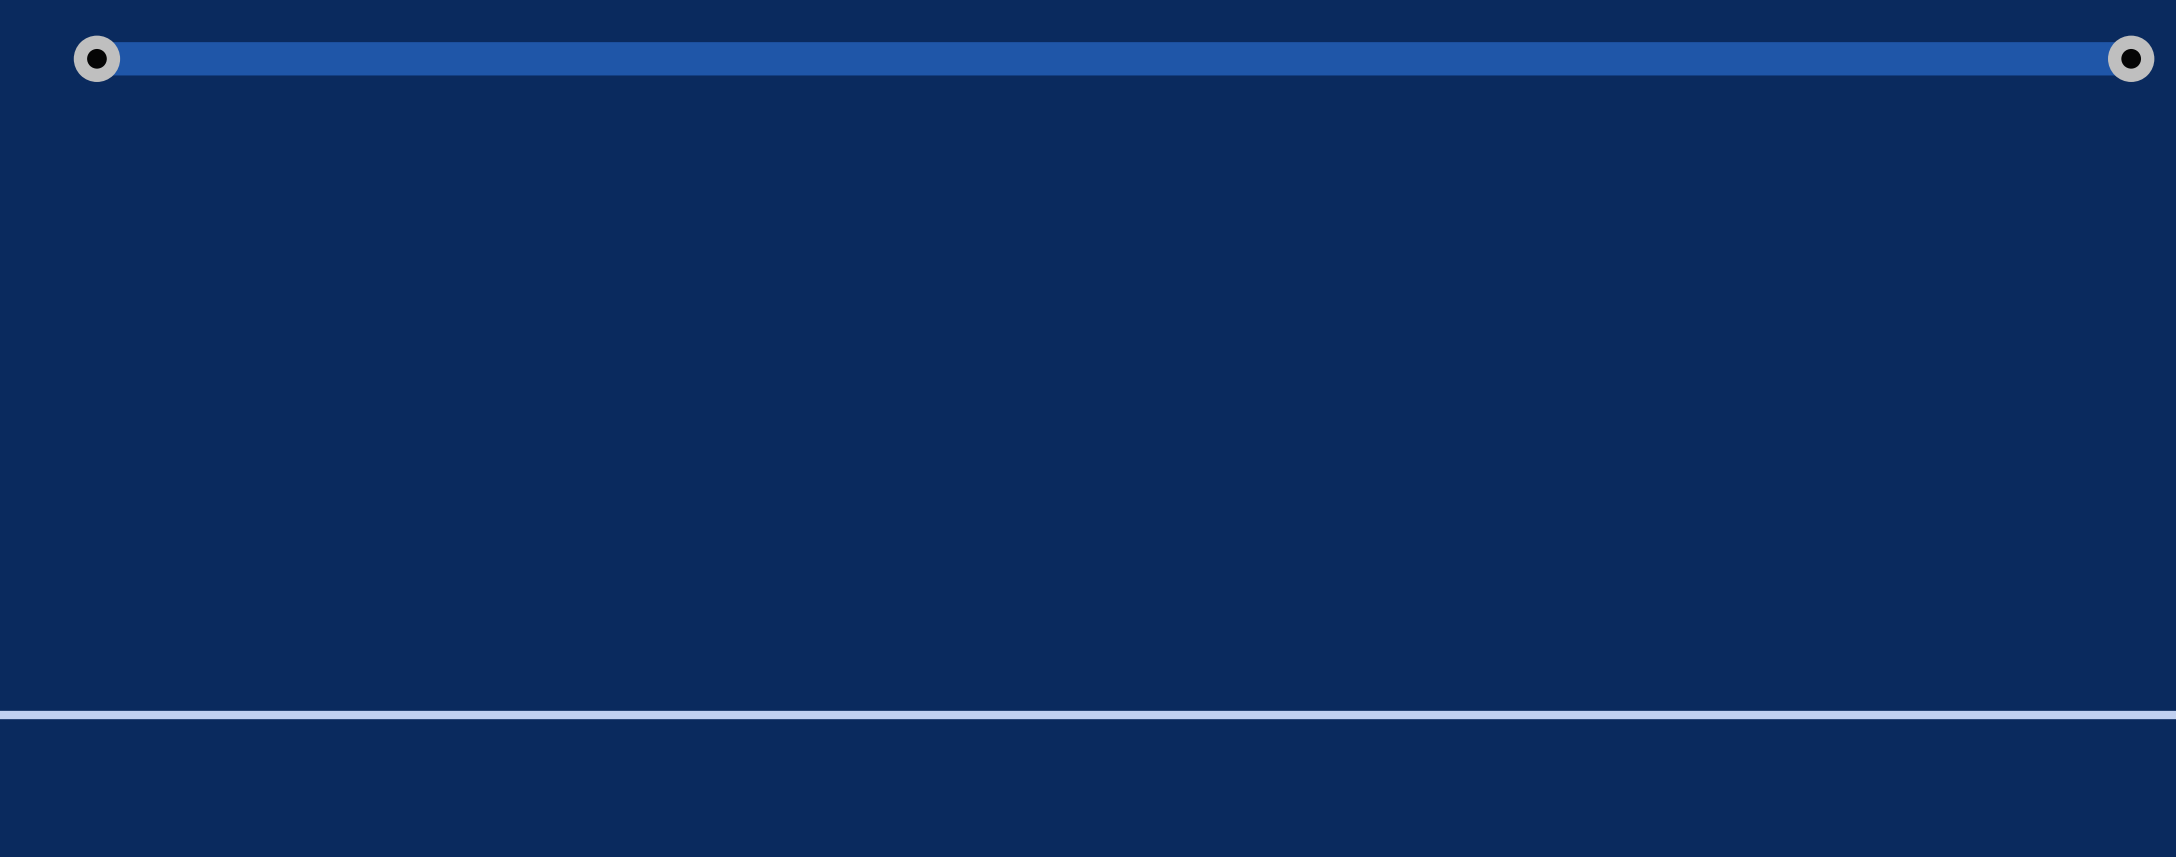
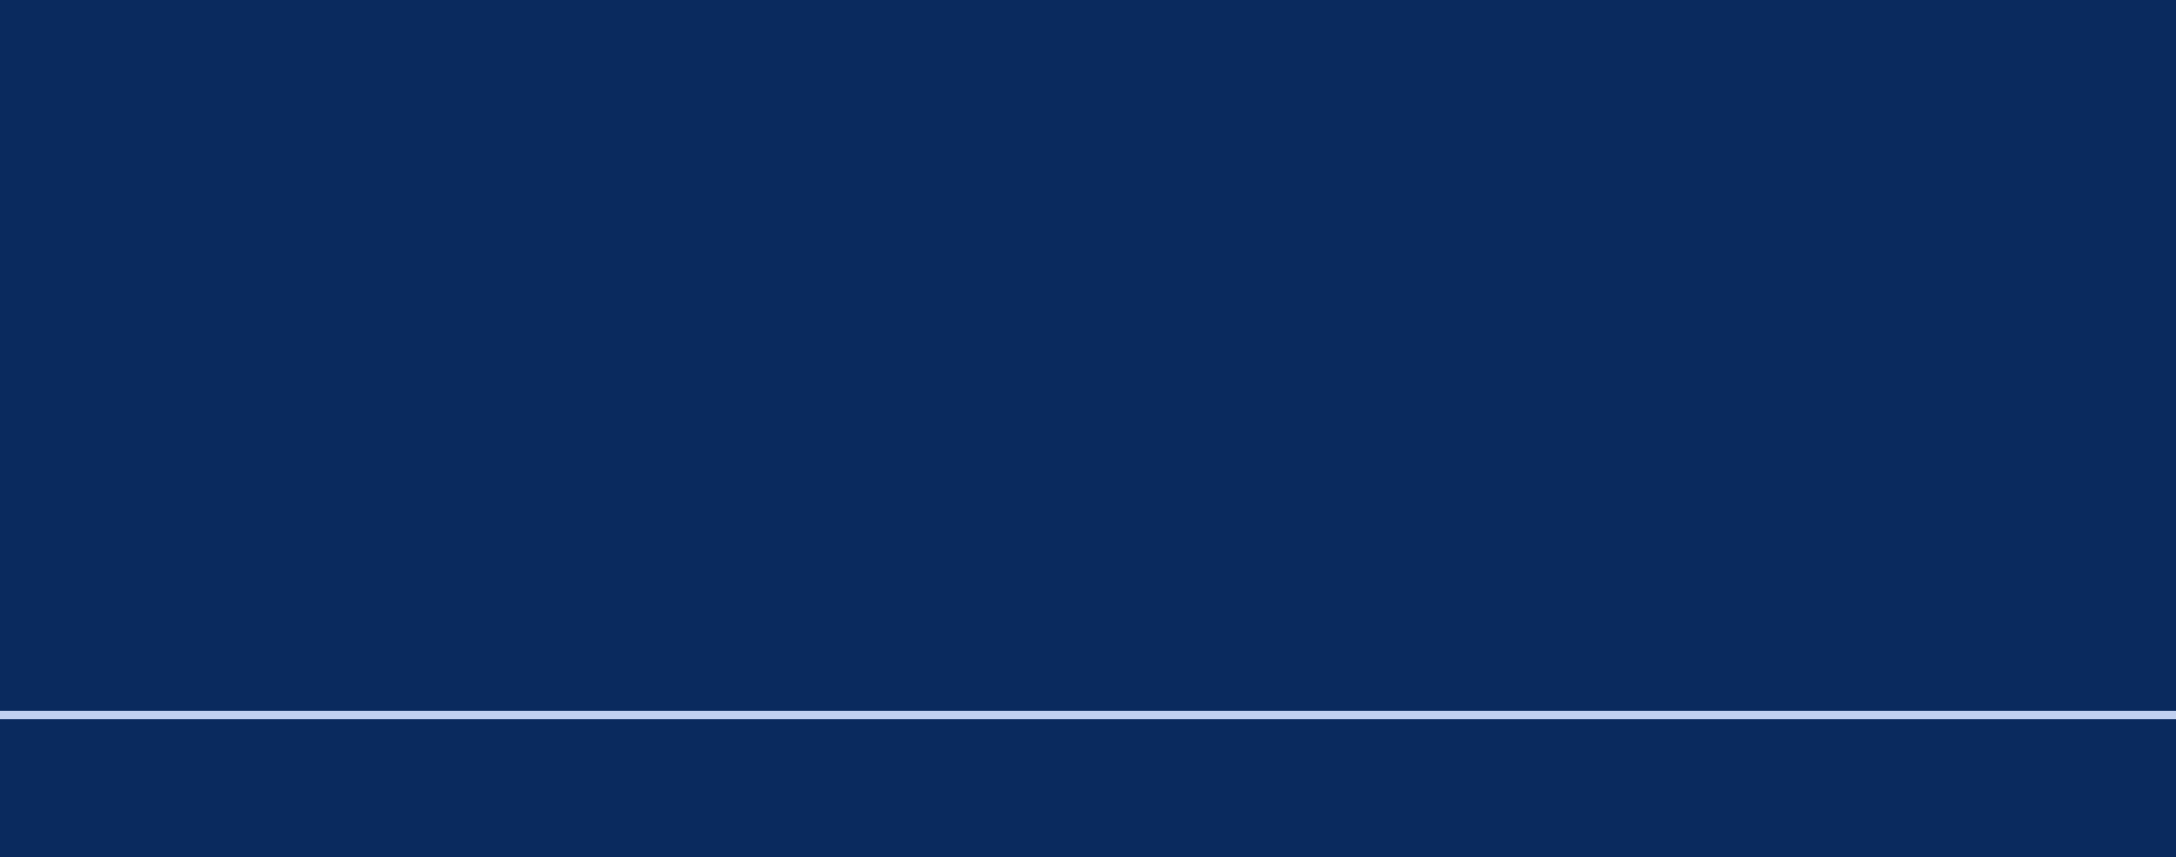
via: (96, 58) -> none
track: (2131, 58) (96, 58) -> none
via: (2131, 58) -> none

